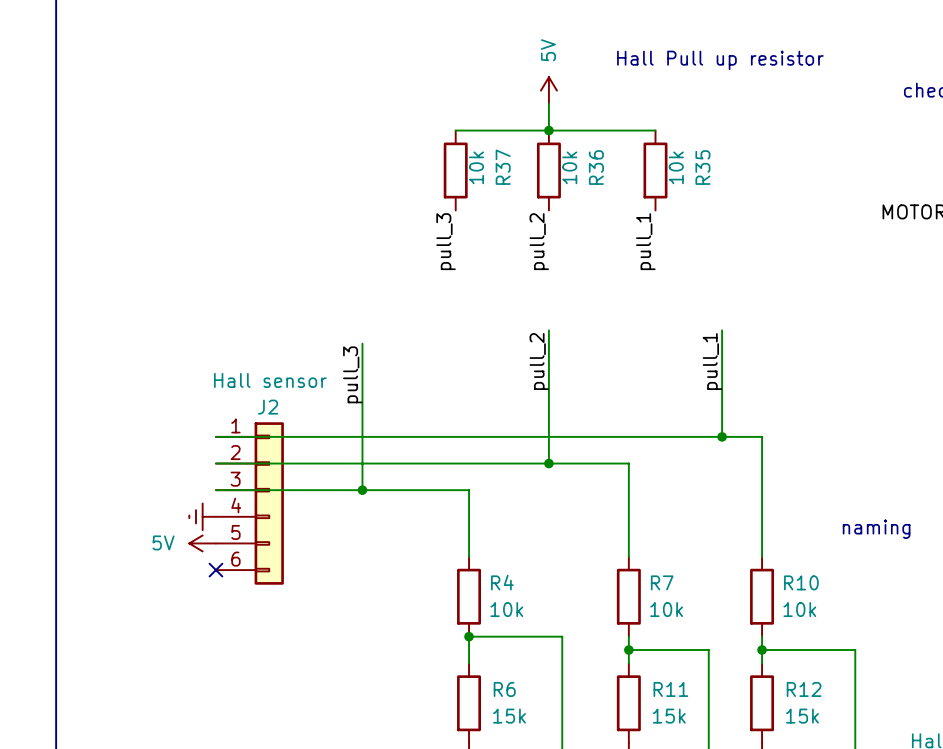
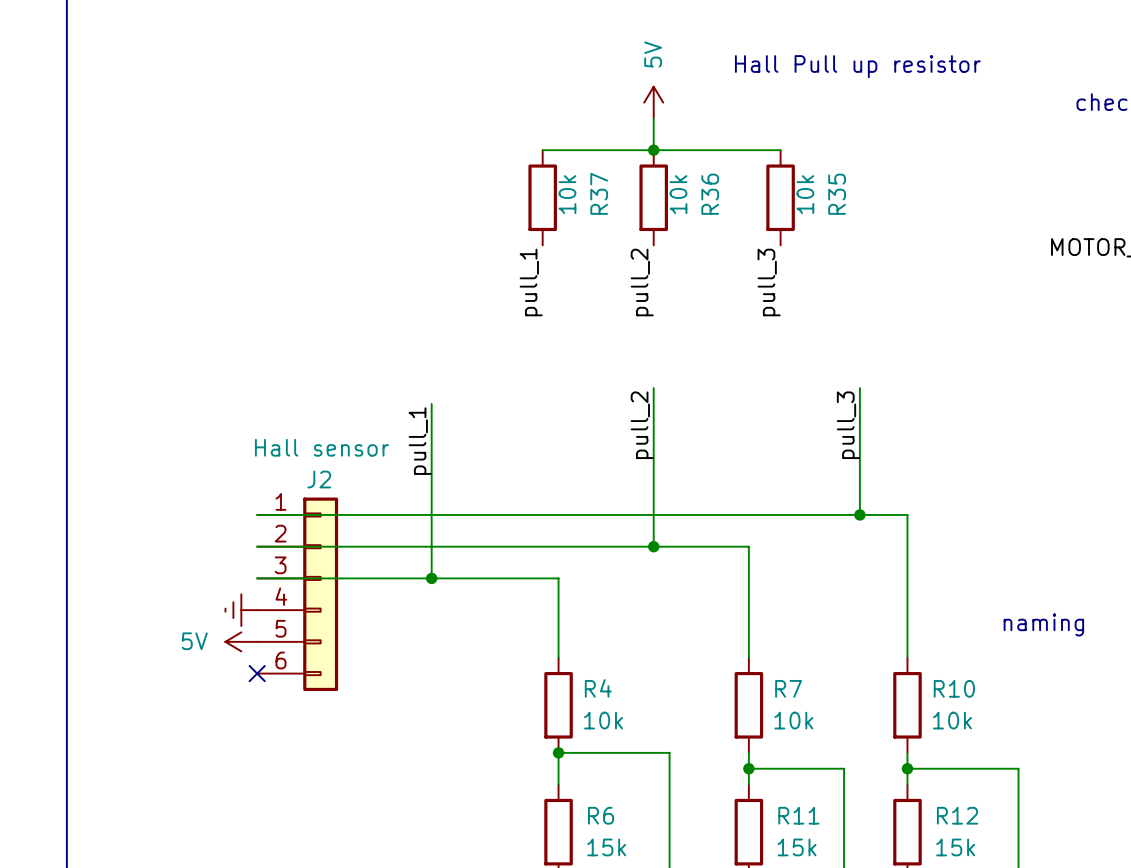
label: pull_3 (446, 241) -> pull_1 (531, 282)
label: pull_1 (645, 241) -> pull_3 (769, 282)
label: pull_1 (712, 361) -> pull_3 (848, 425)
label: pull_3 (352, 374) -> pull_1 (420, 441)

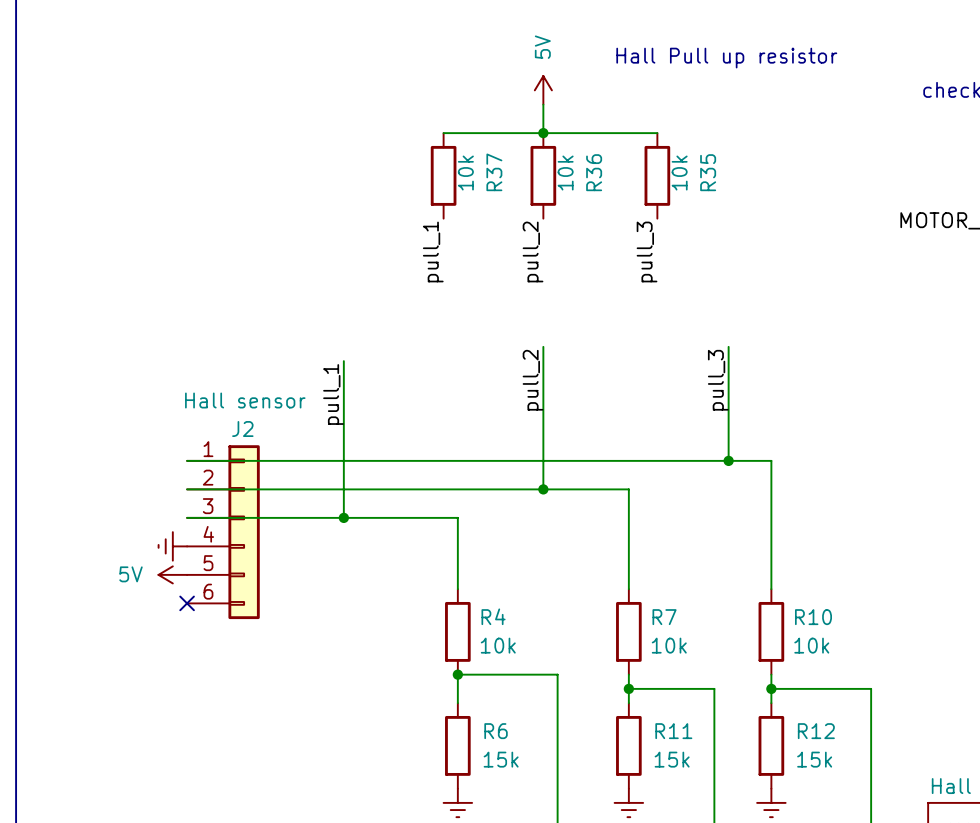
text: naming (1043, 624) -> none

